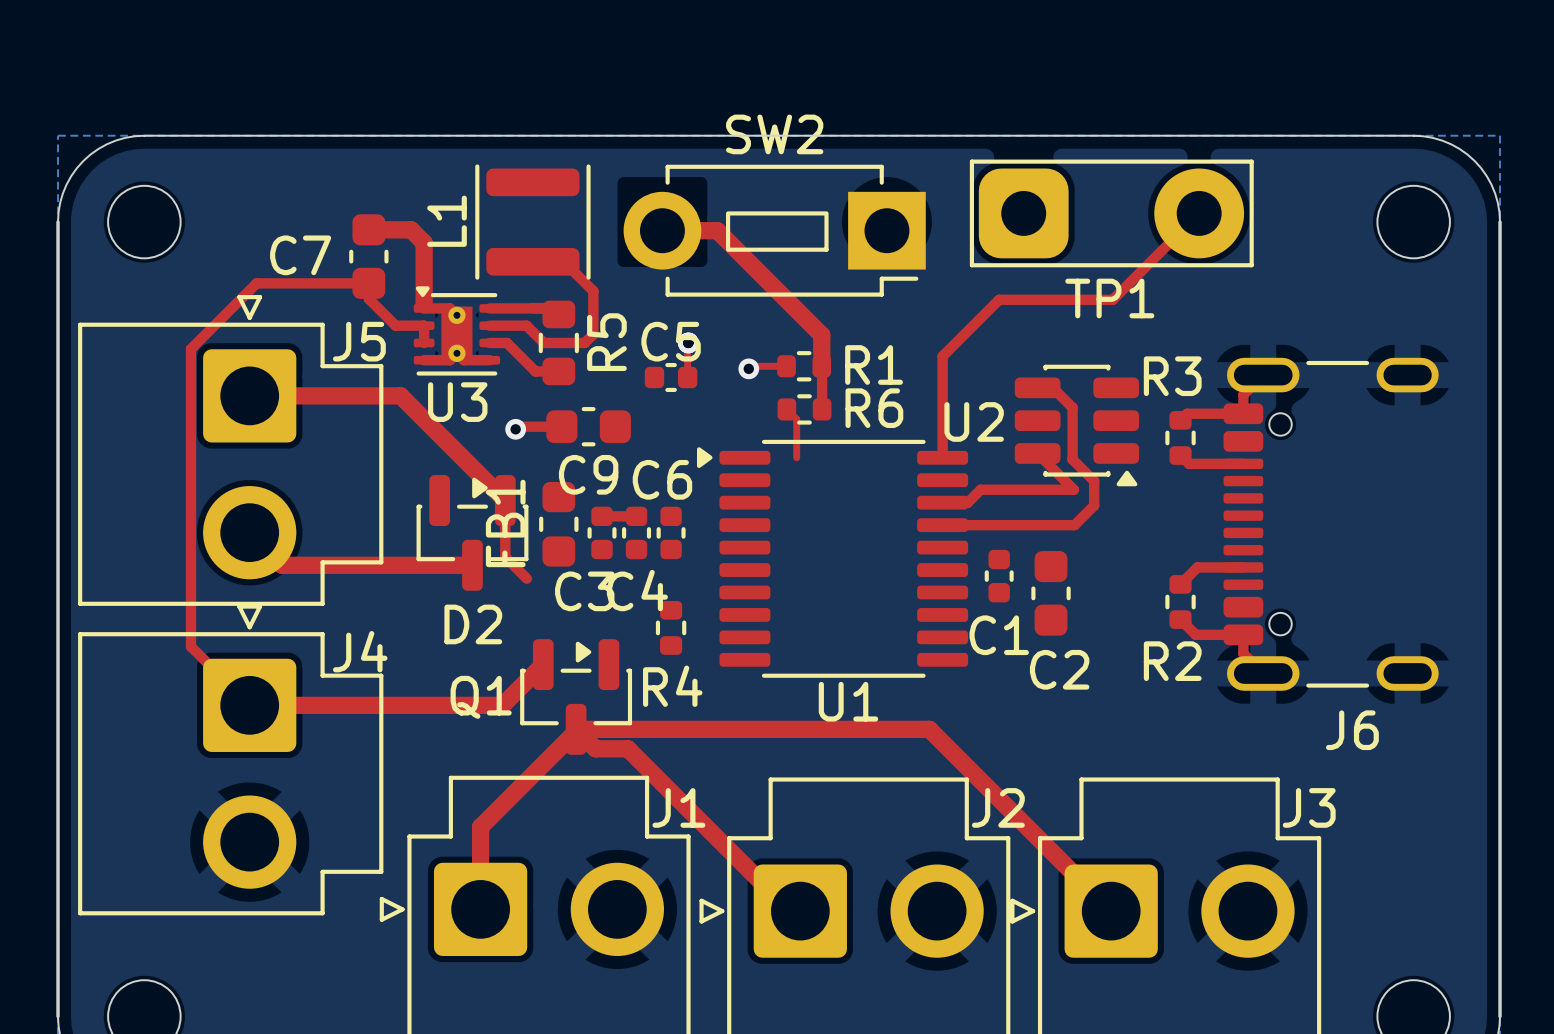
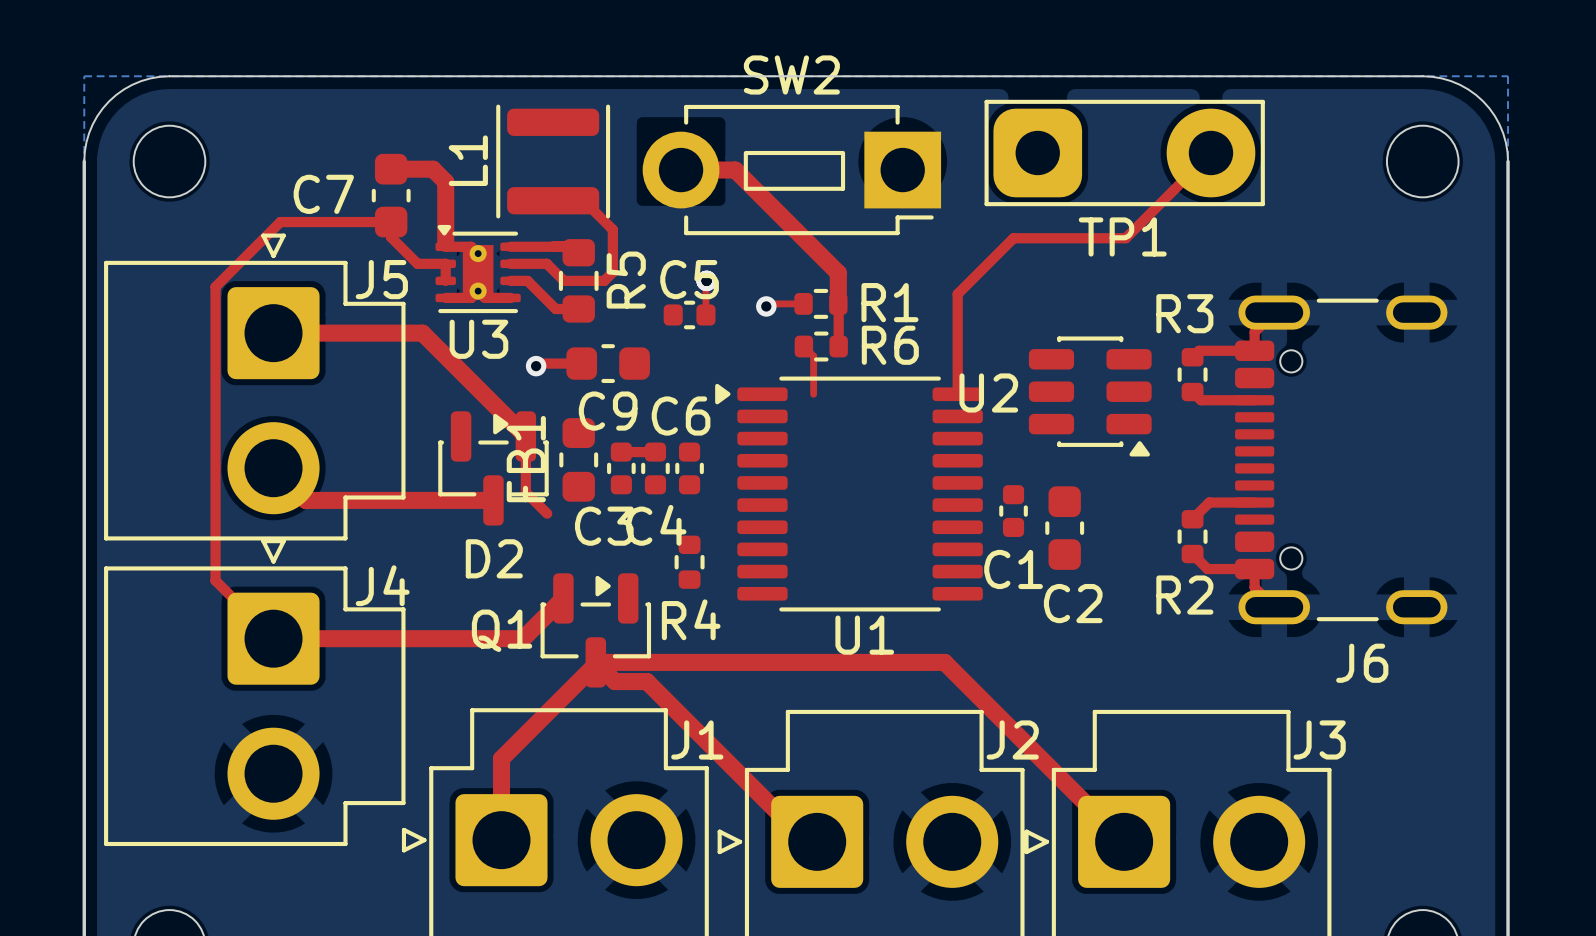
top track: (1037, 387) (1052, 387) (1072, 407) (1072, 459) (1094, 481) (1094, 505) (1074, 525) (942, 525) -> none
U2 position: (1076, 425) -> (1090, 396)
top track: (1037, 453) (1073, 489) (980, 489) (967, 502) (942, 502) -> none

